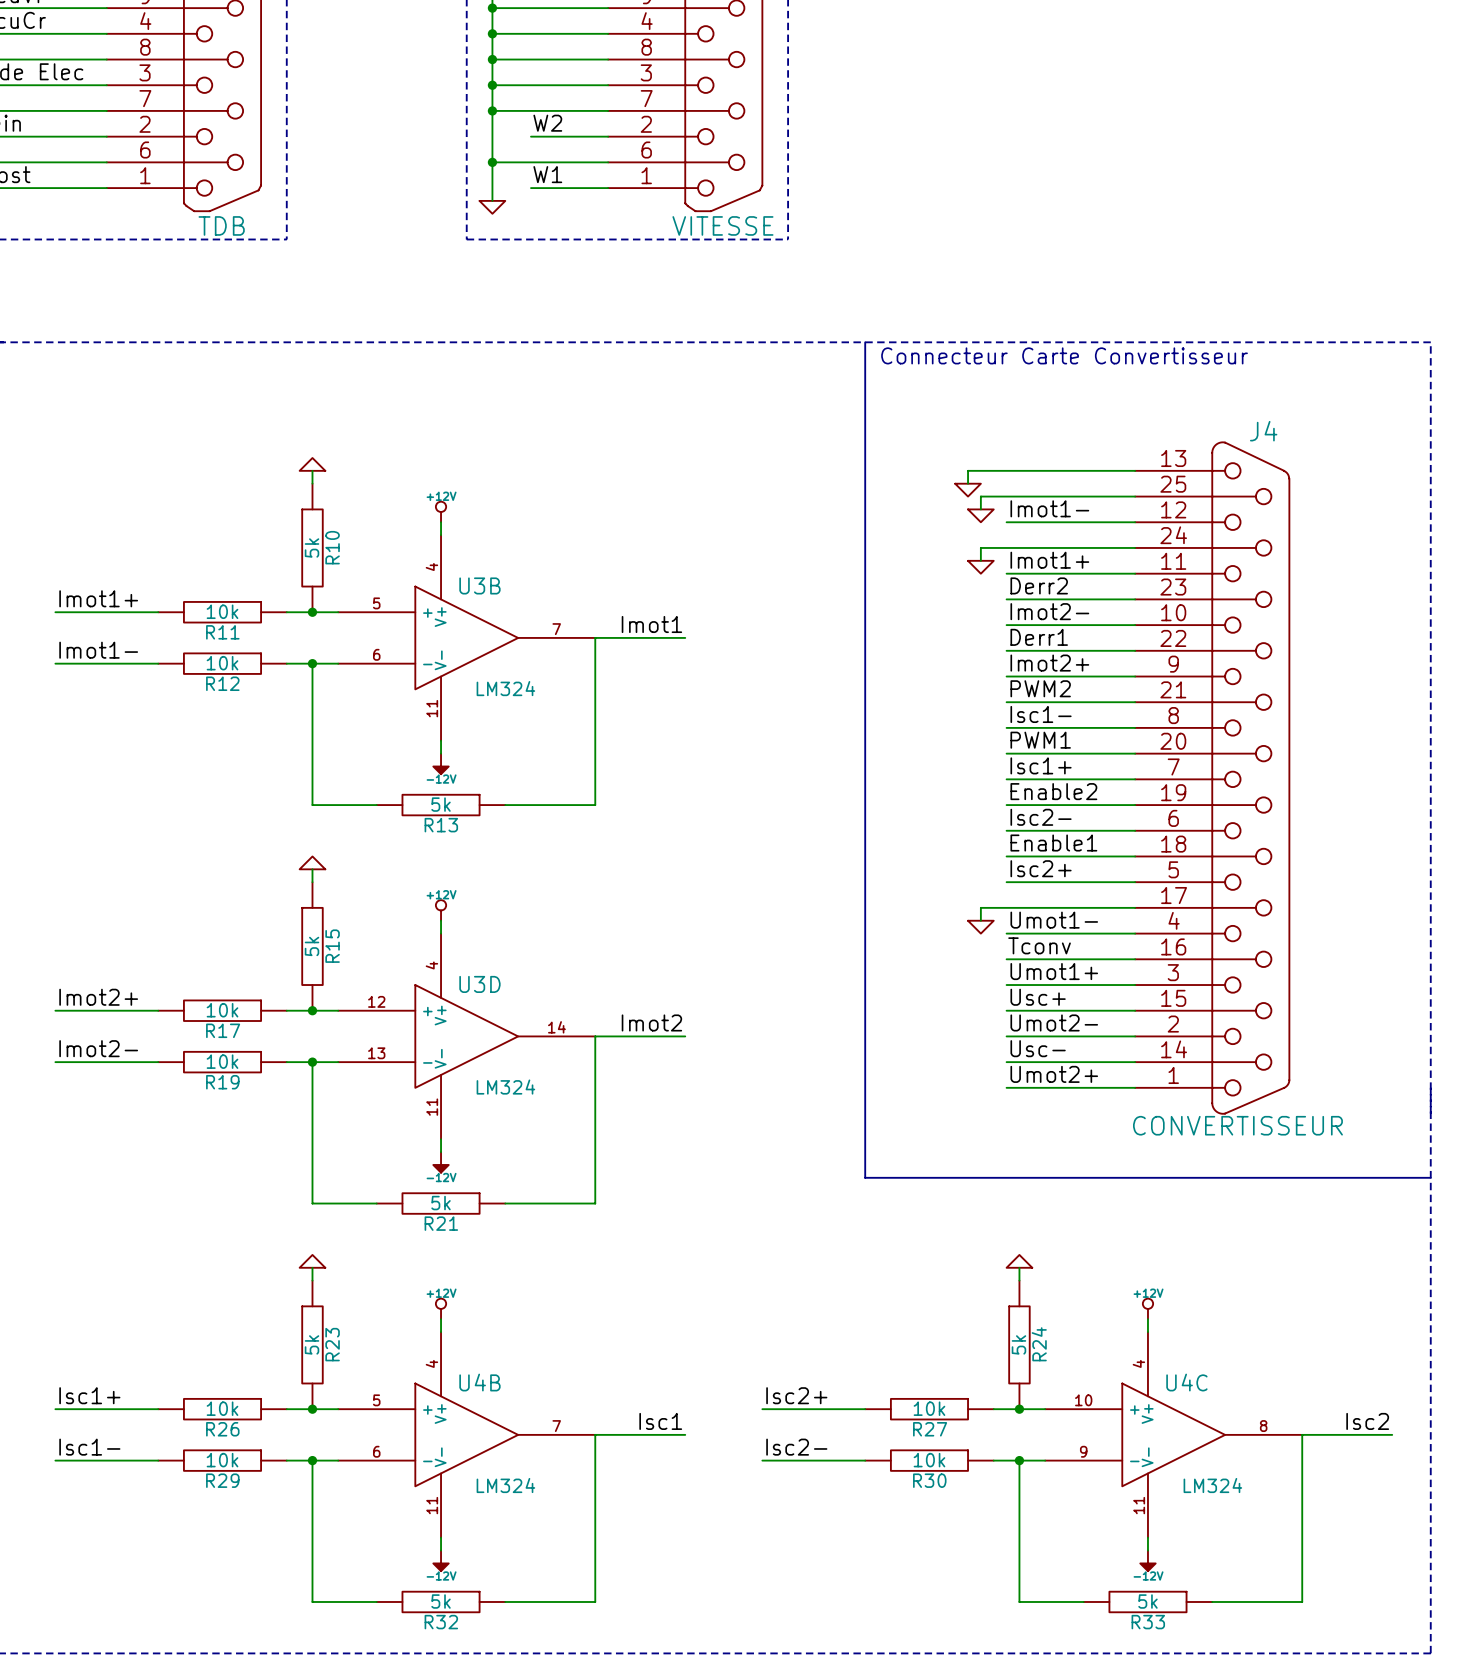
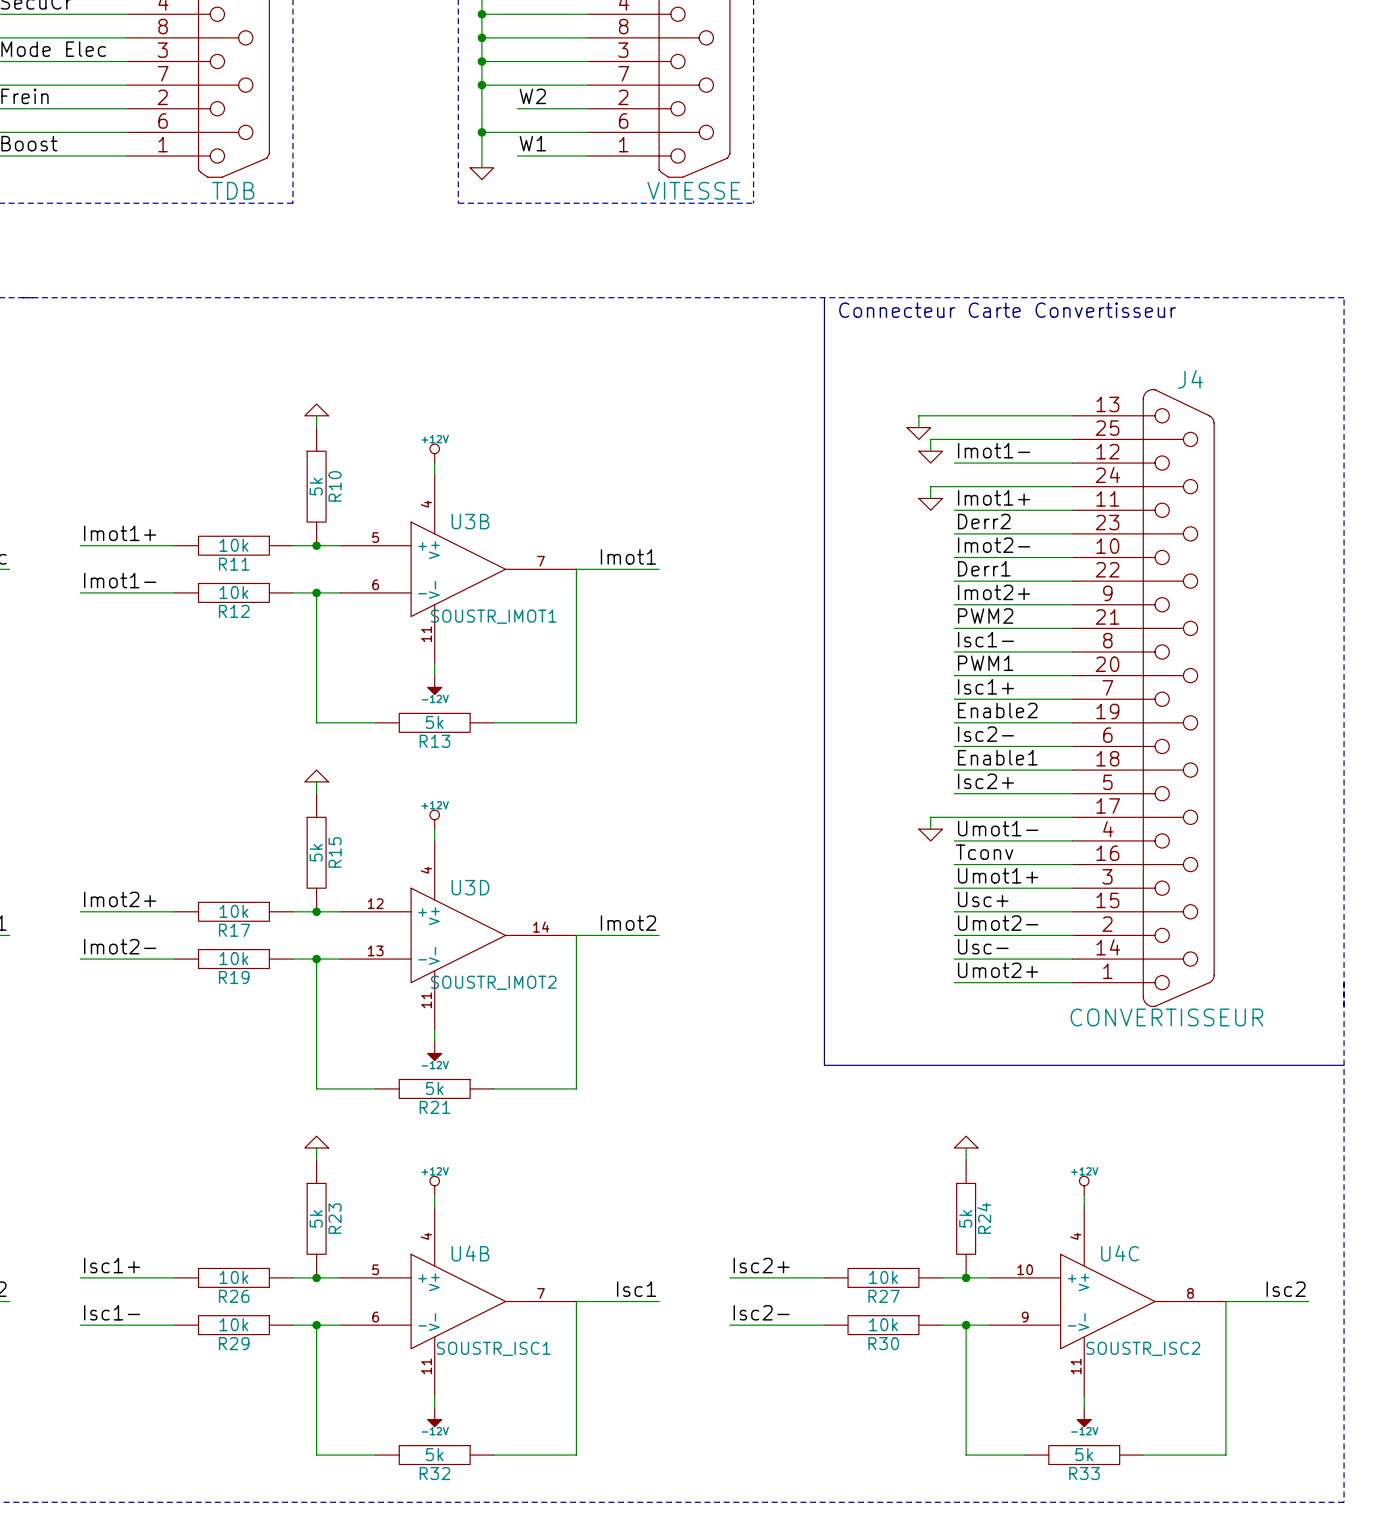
U3B value: LM324 (505, 688) -> SOUSTR_IMOT1 (493, 616)
U3D value: LM324 (505, 1087) -> SOUSTR_IMOT2 (493, 982)
U4B value: LM324 (505, 1485) -> SOUSTR_ISC1 (493, 1348)
U4C value: LM324 (1212, 1485) -> SOUSTR_ISC2 (1143, 1348)

